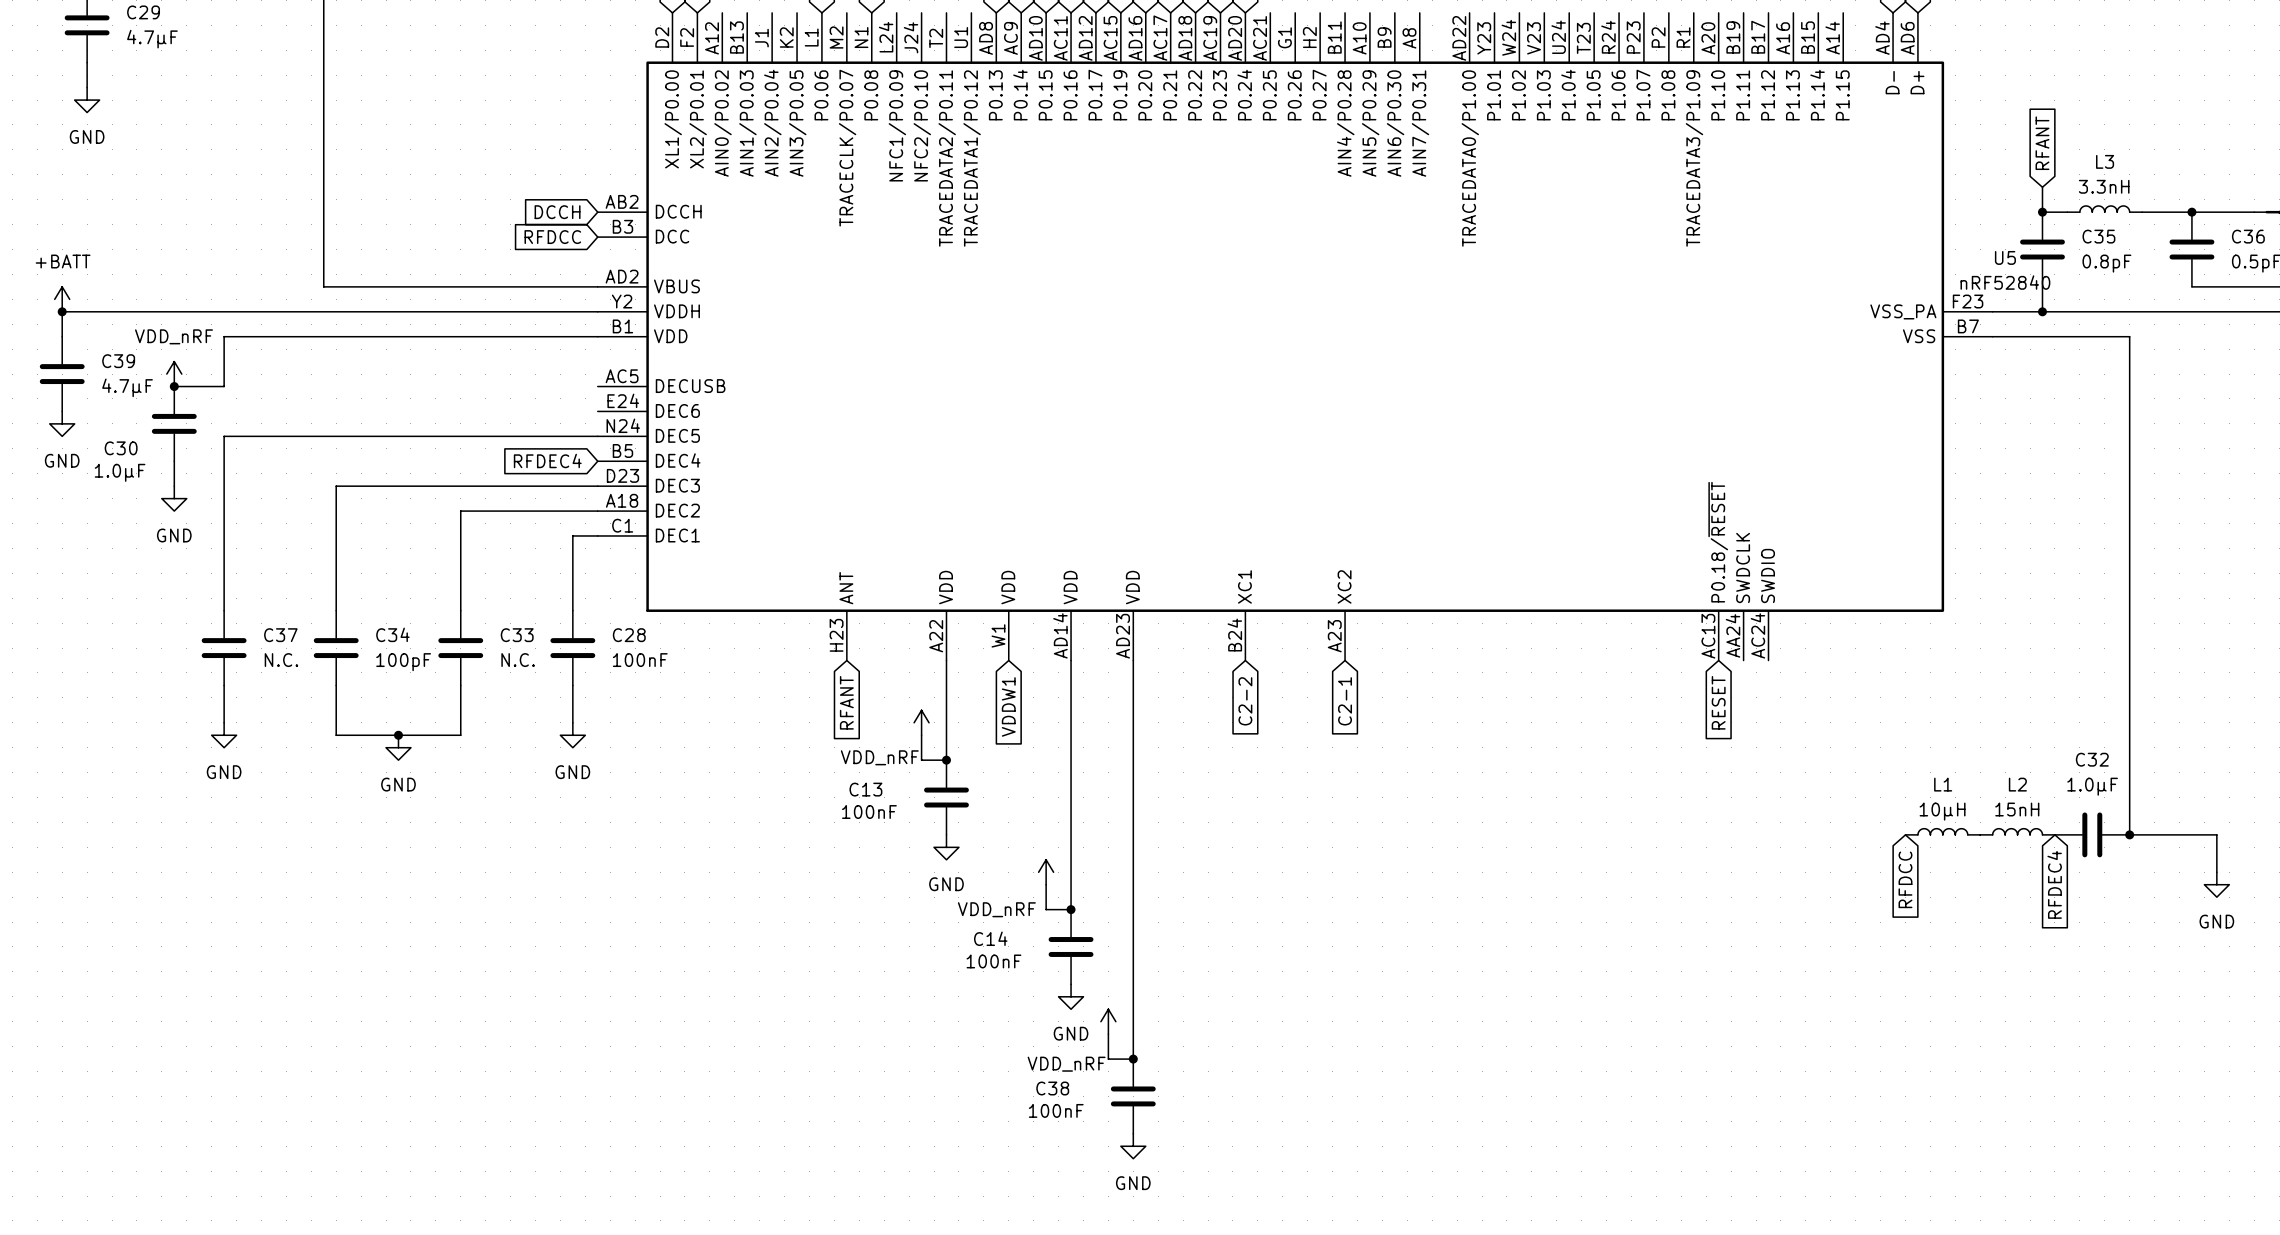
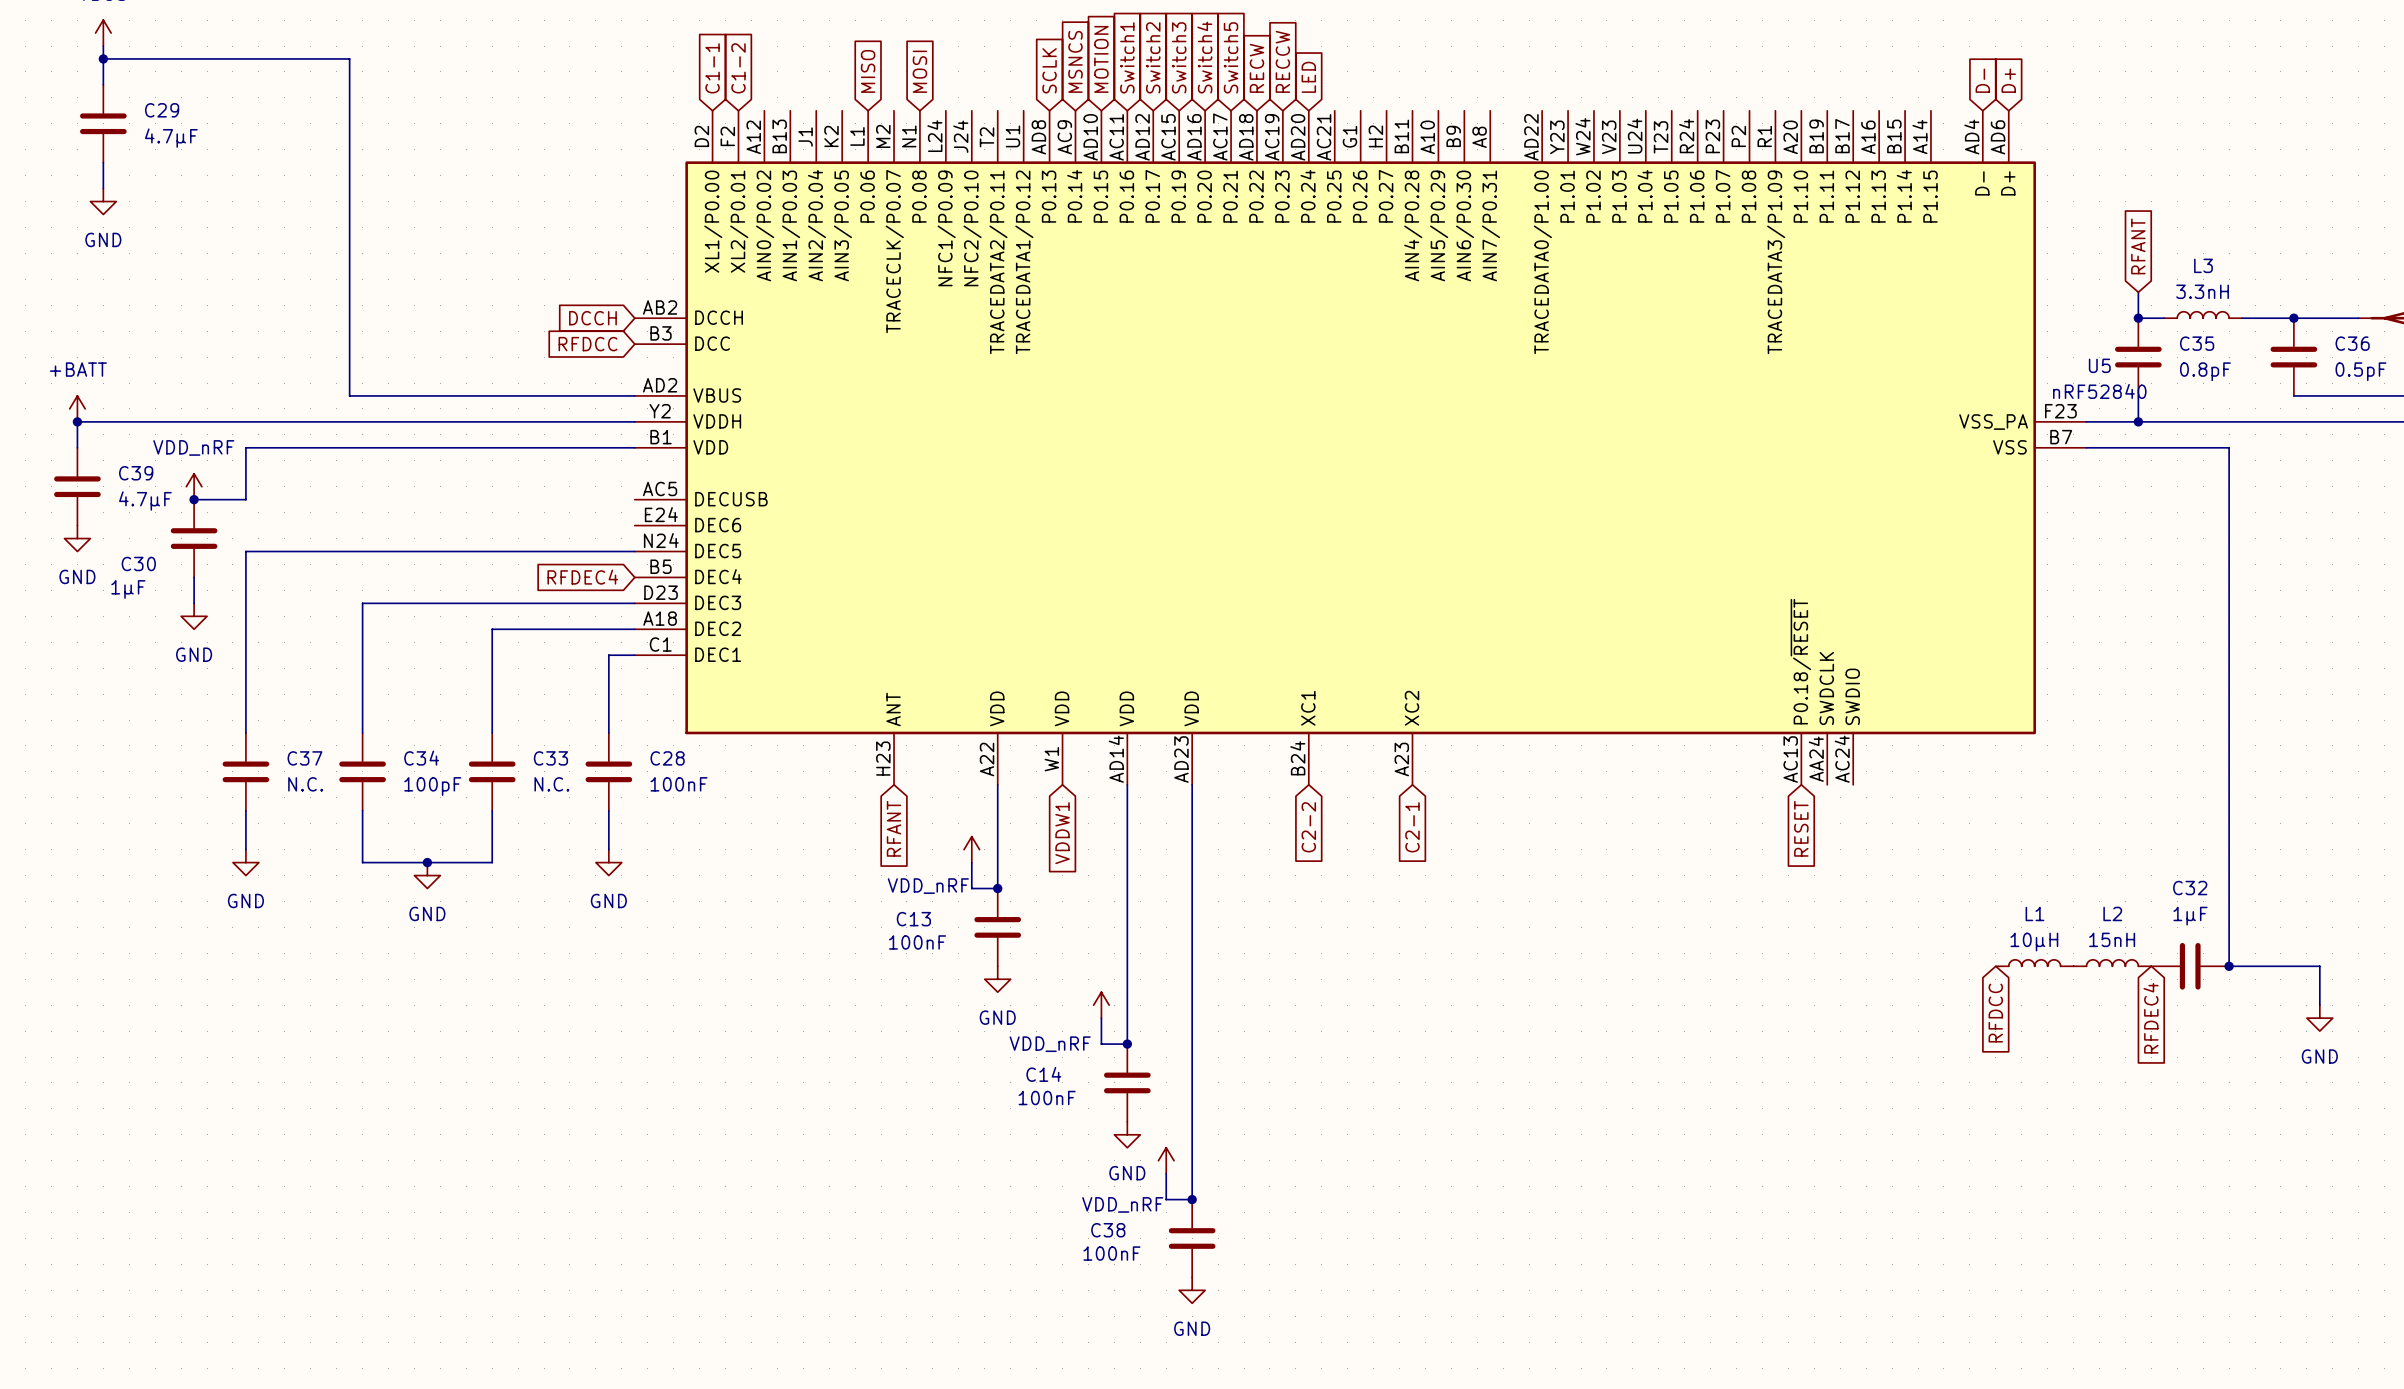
C30 value: 1.0μF (120, 472) -> 1μF (128, 589)
C32 value: 1.0μF (2092, 786) -> 1μF (2190, 916)

